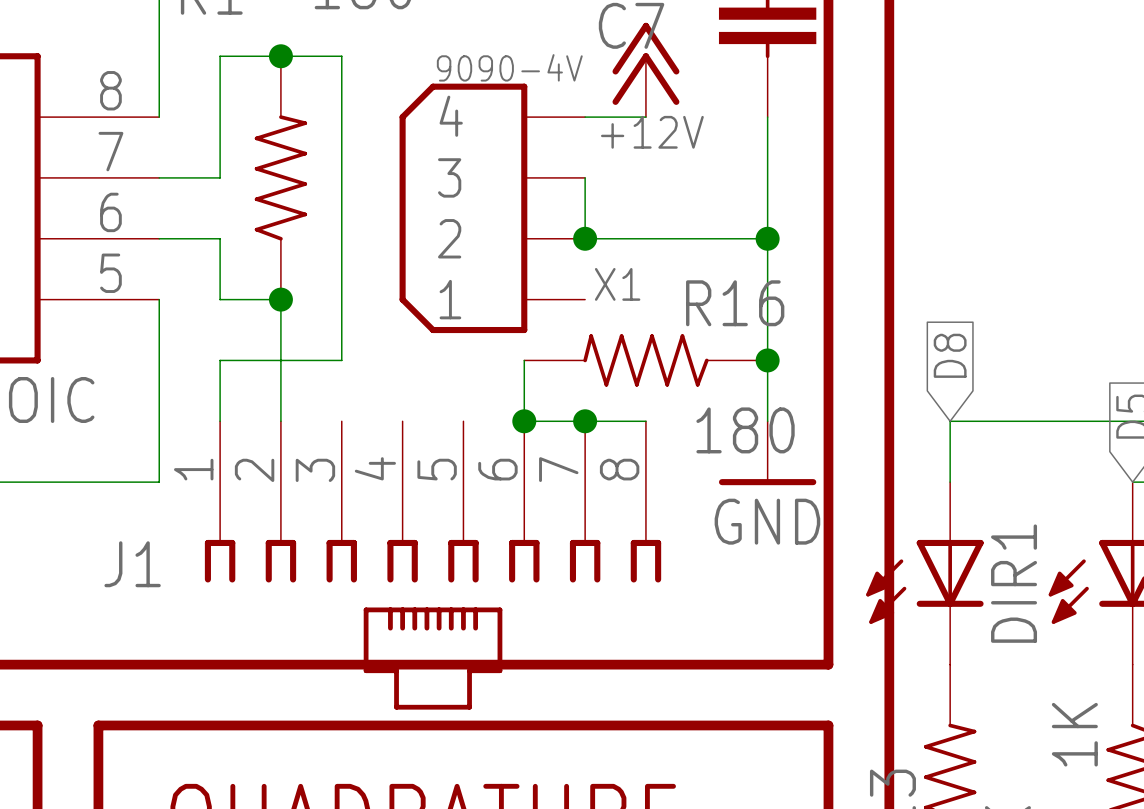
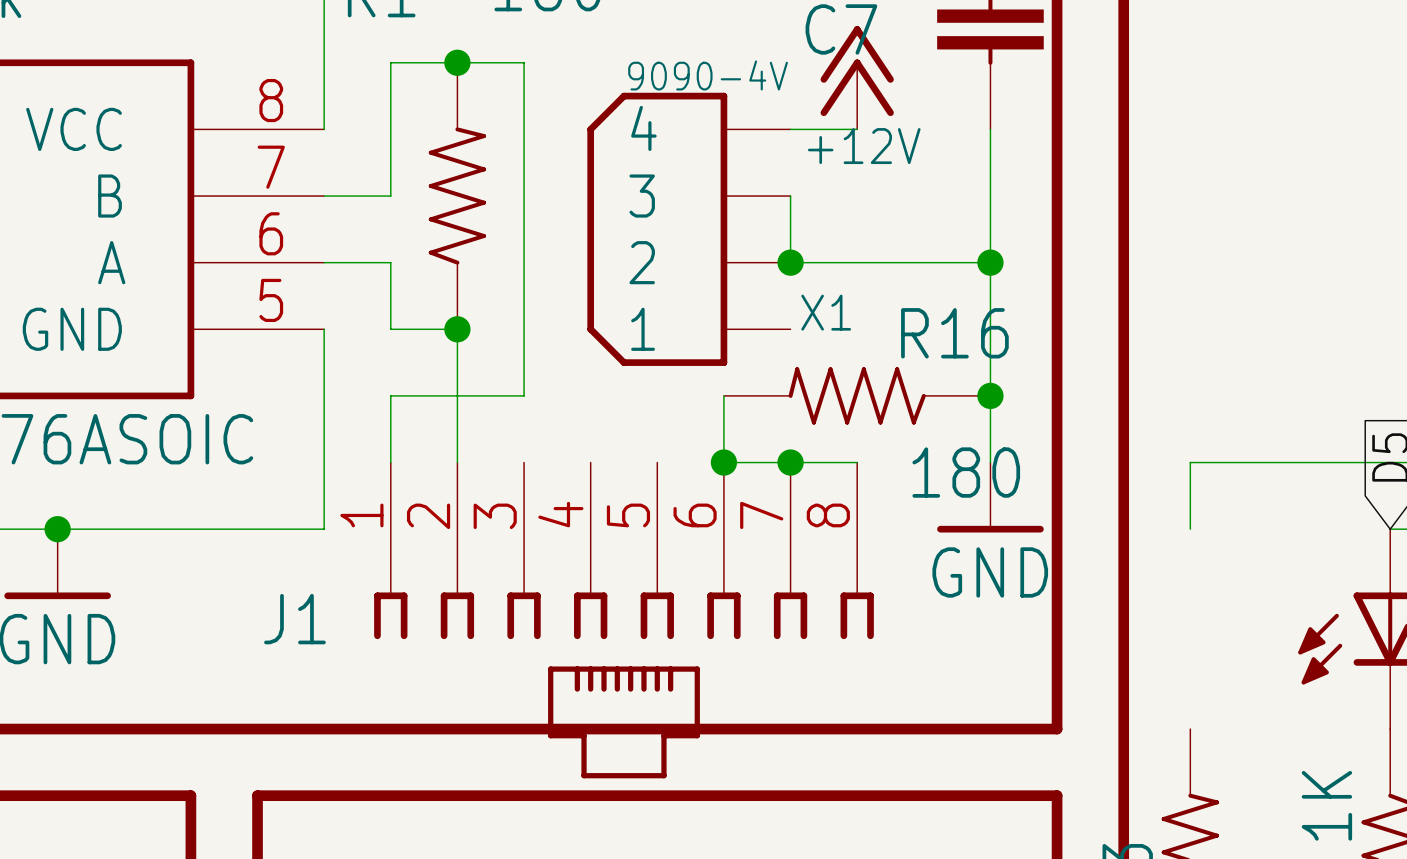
global label: D8 (950, 355) -> none
DIR1: (924, 573) -> none

